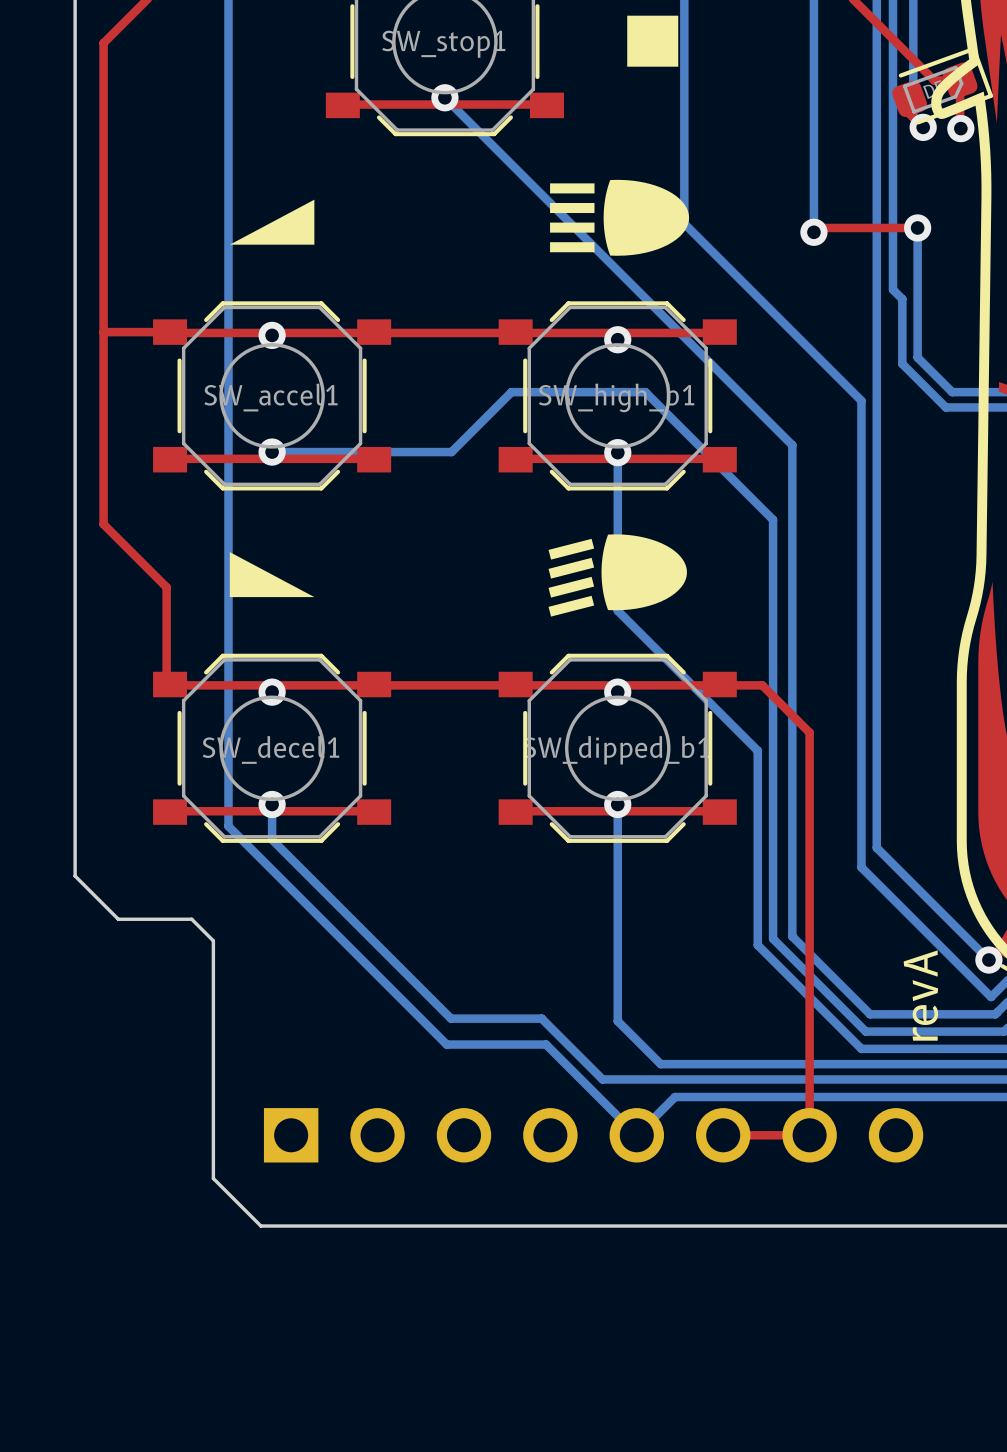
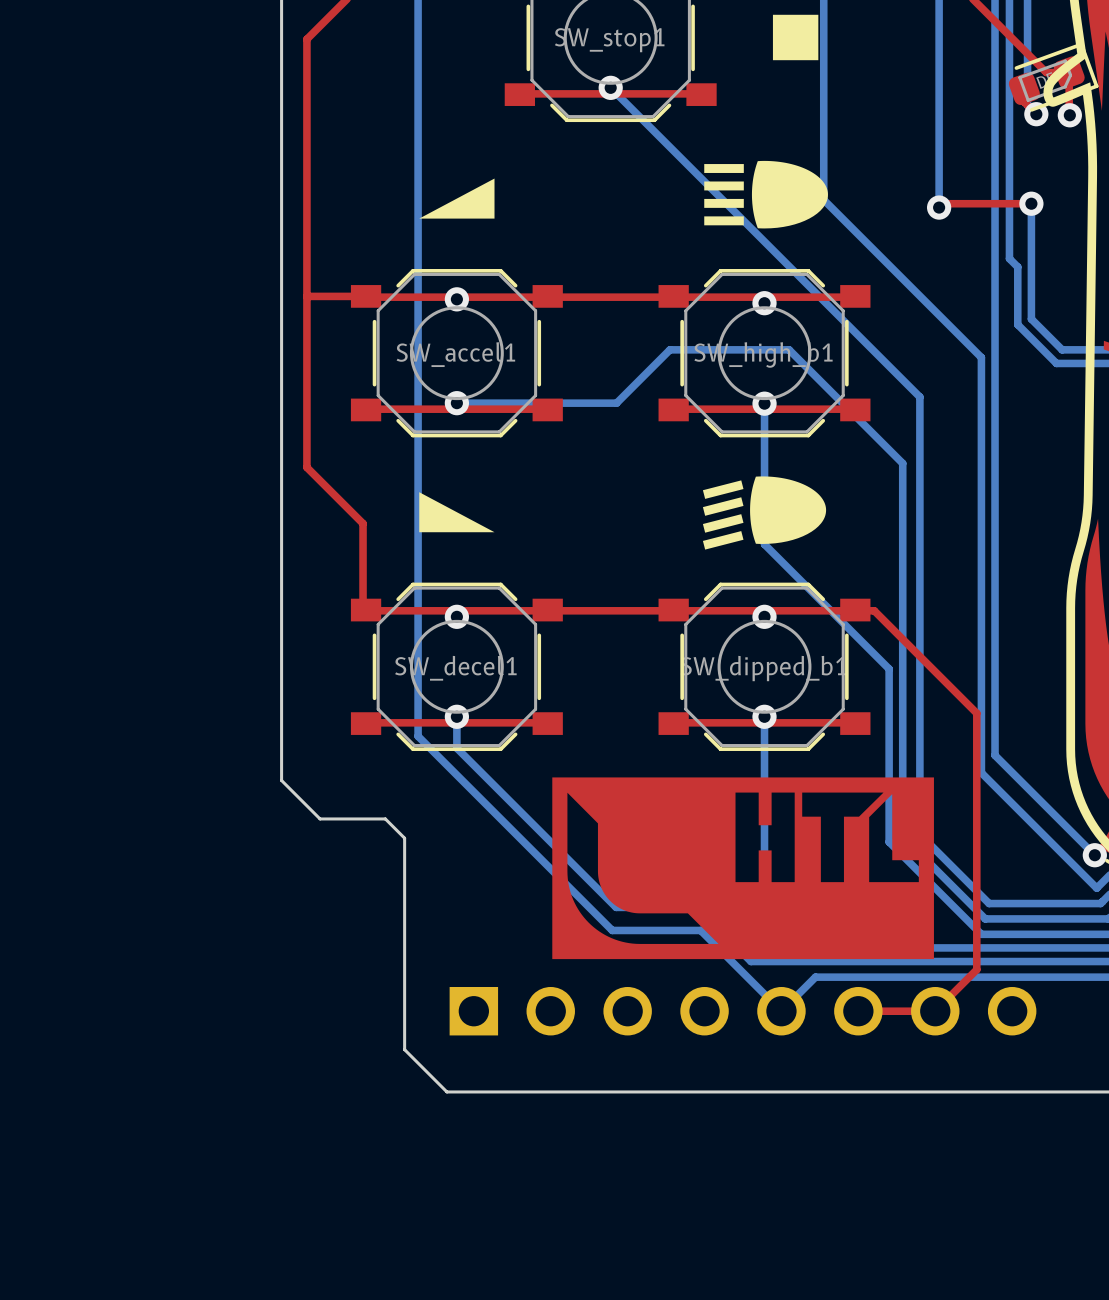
top track: (741, 685) (762, 685) (809, 732) (809, 1135) -> (874, 610) (976, 713) (976, 969) (935, 1011)
drawing: none -> [552, 777, 934, 960]
text: revA (920, 995) -> none

